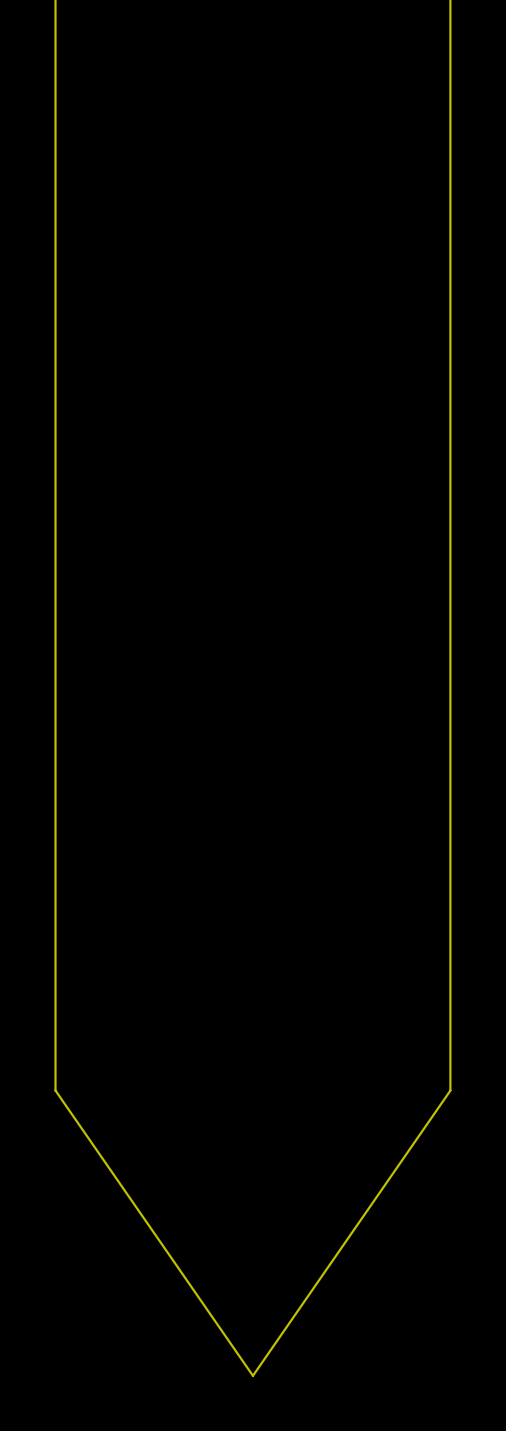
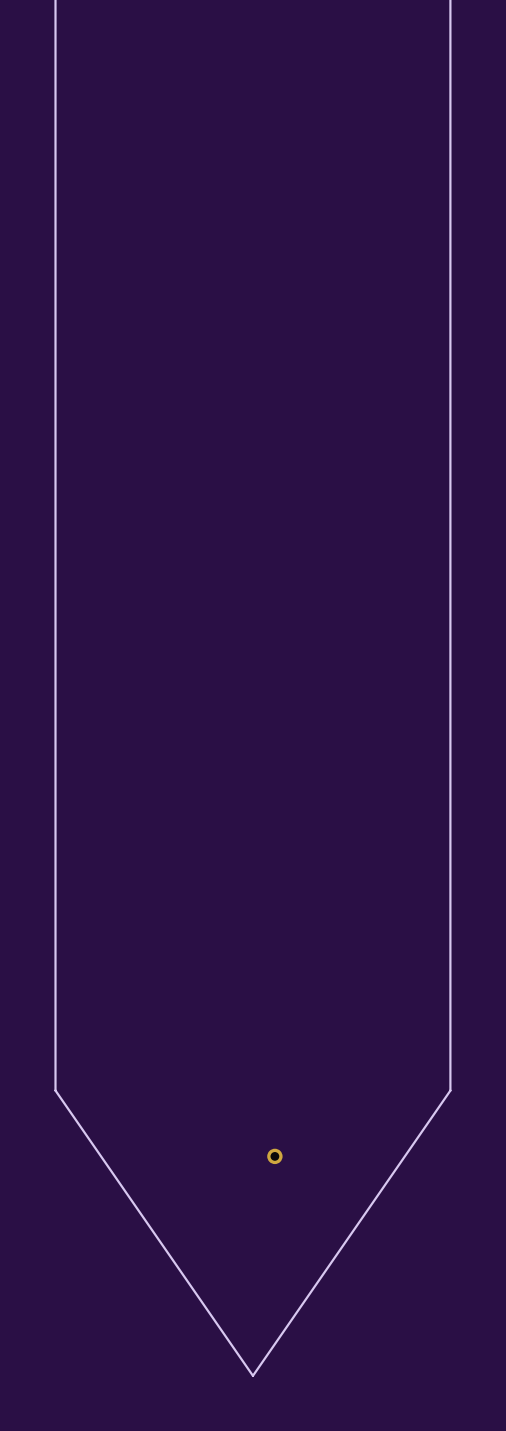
via: none -> (274, 1156)

